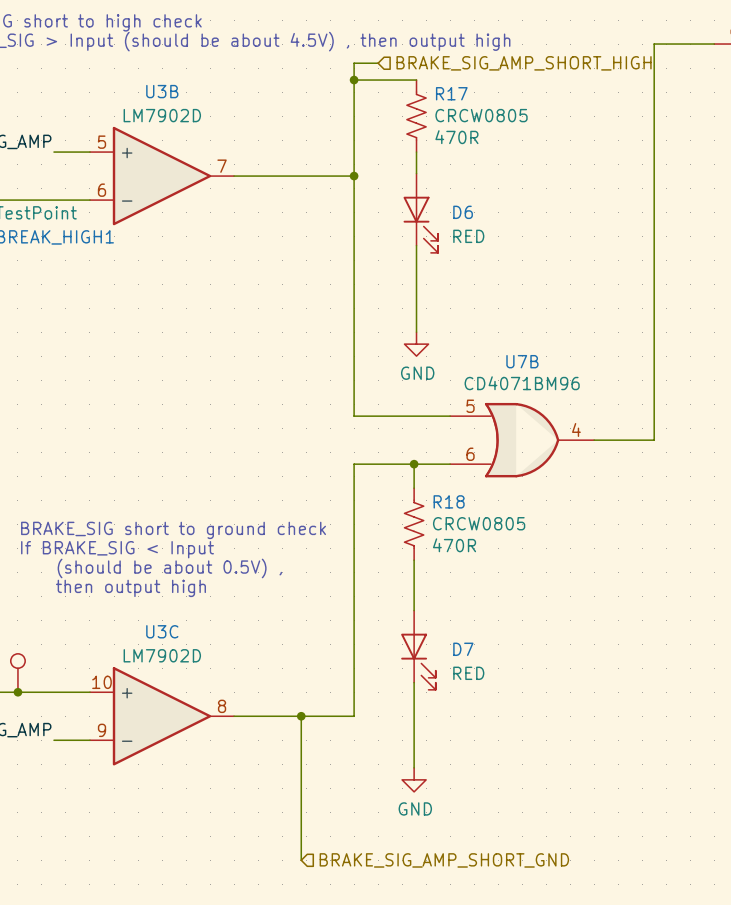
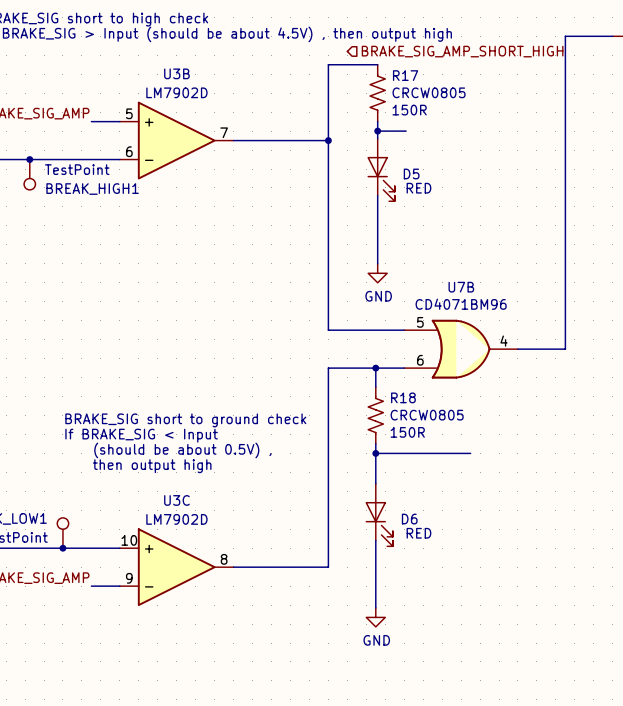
wire: (378, 63) (354, 63) (354, 80) -> none
junction: (354, 80) -> none
R17 text: 470R (456, 137) -> 150R (409, 110)
wire: none -> (377, 131) (406, 131)
junction: none -> (377, 131)
D6 name: D6 (463, 212) -> D5 (411, 173)
R18 text: 470R (454, 545) -> 150R (407, 432)
wire: none -> (375, 453) (470, 453)
junction: none -> (375, 453)
D7 name: D7 (463, 649) -> D6 (409, 519)
wire: (301, 716) (301, 860) -> none
junction: (301, 716) -> none
hierarchical label: BRAKE_SIG_AMP_SHORT_GND (444, 860) -> none

